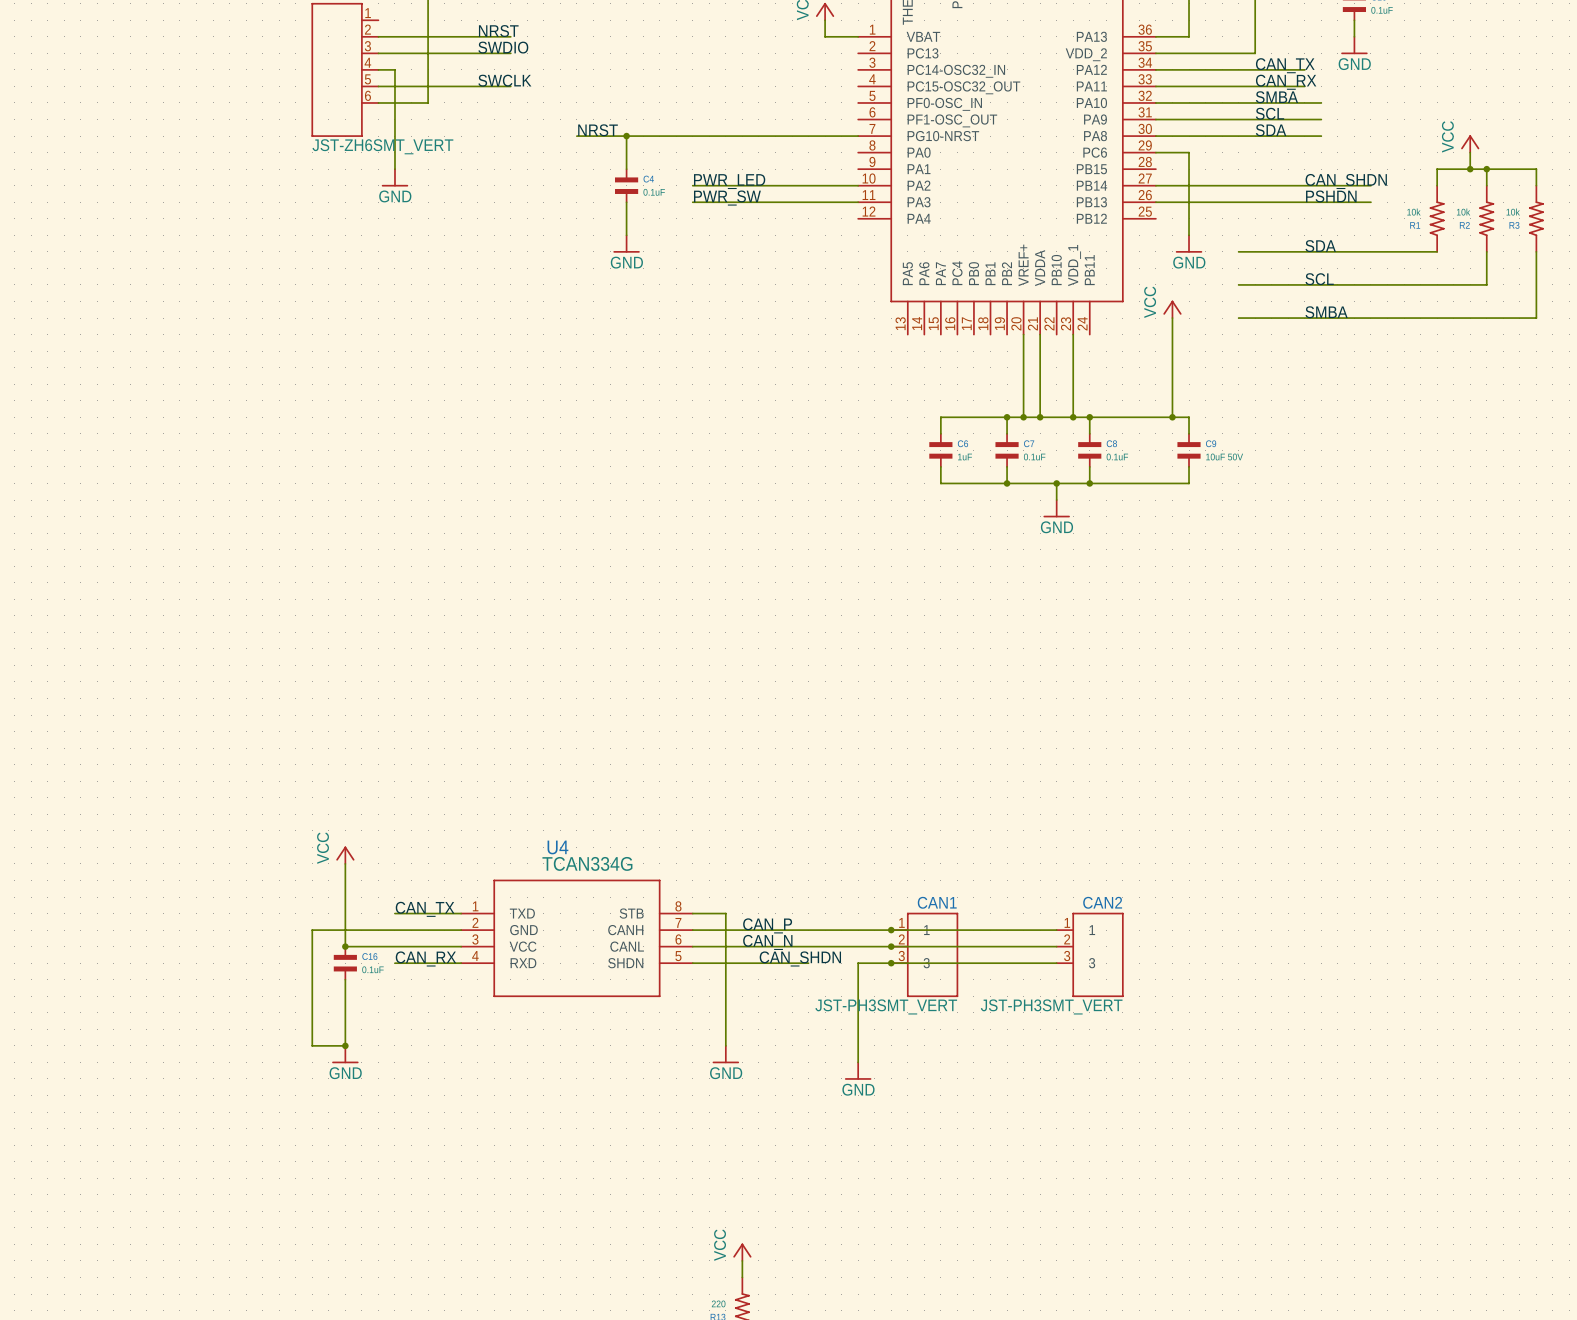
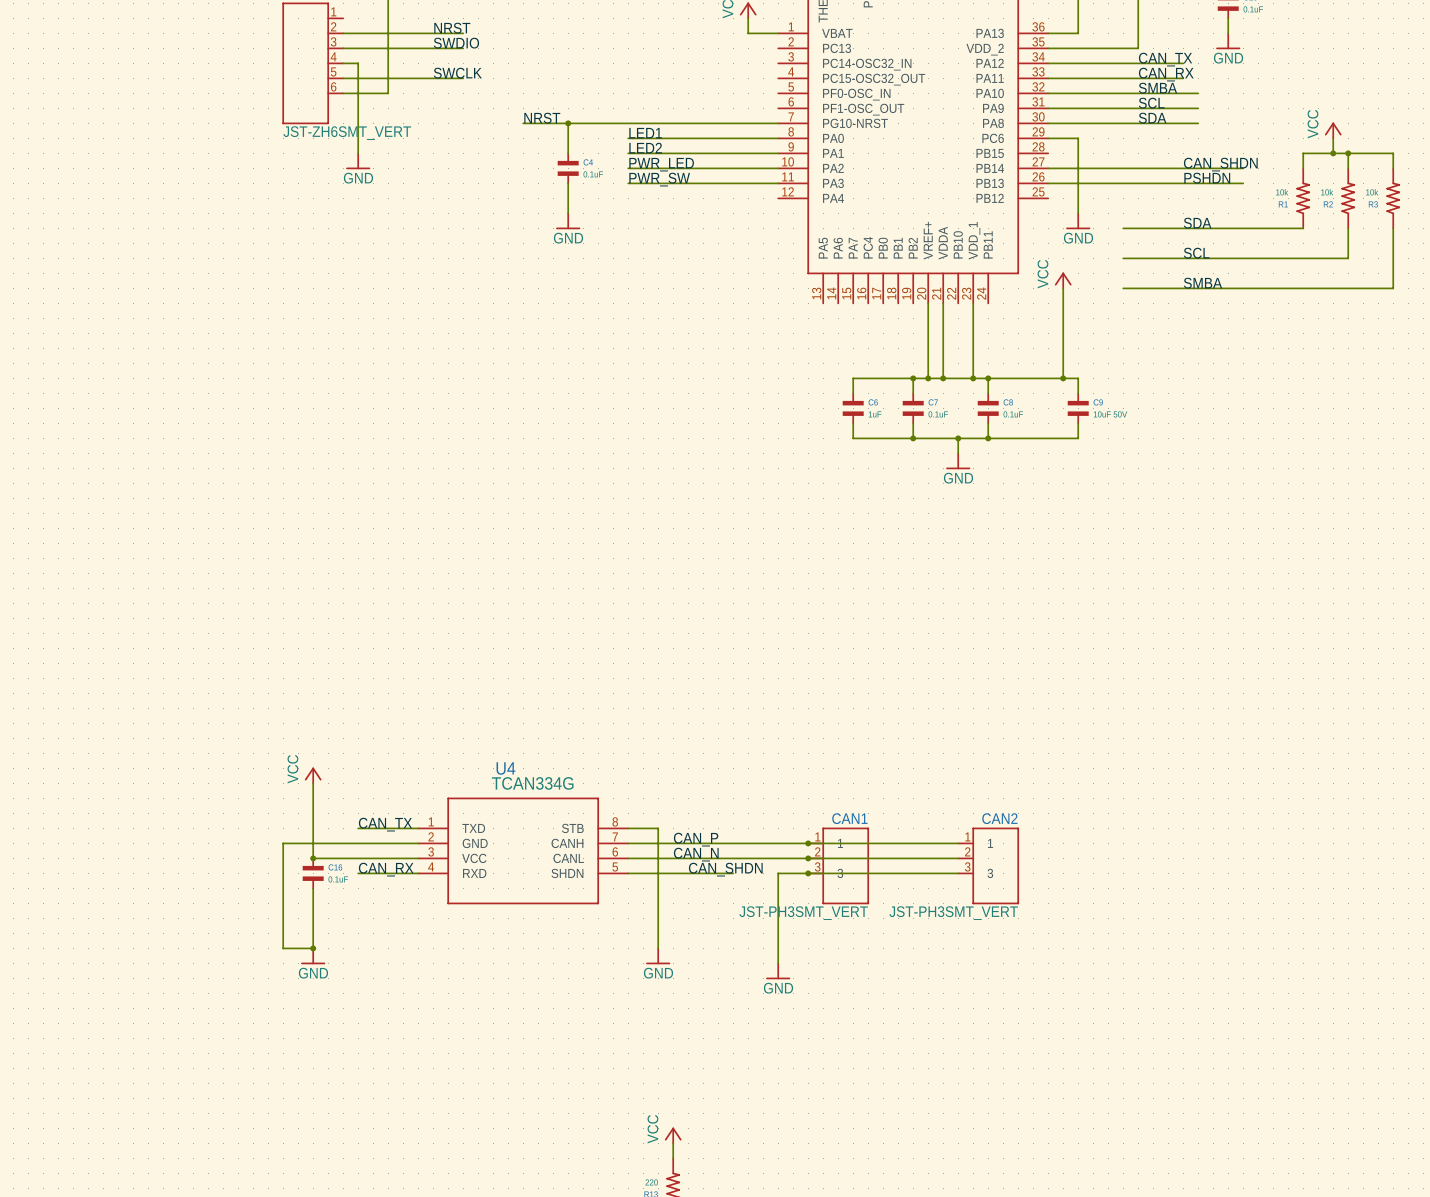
label: none -> LED1 (645, 133)
wire: none -> (628, 138) (778, 138)
label: none -> LED2 (645, 148)
wire: none -> (628, 153) (778, 153)

